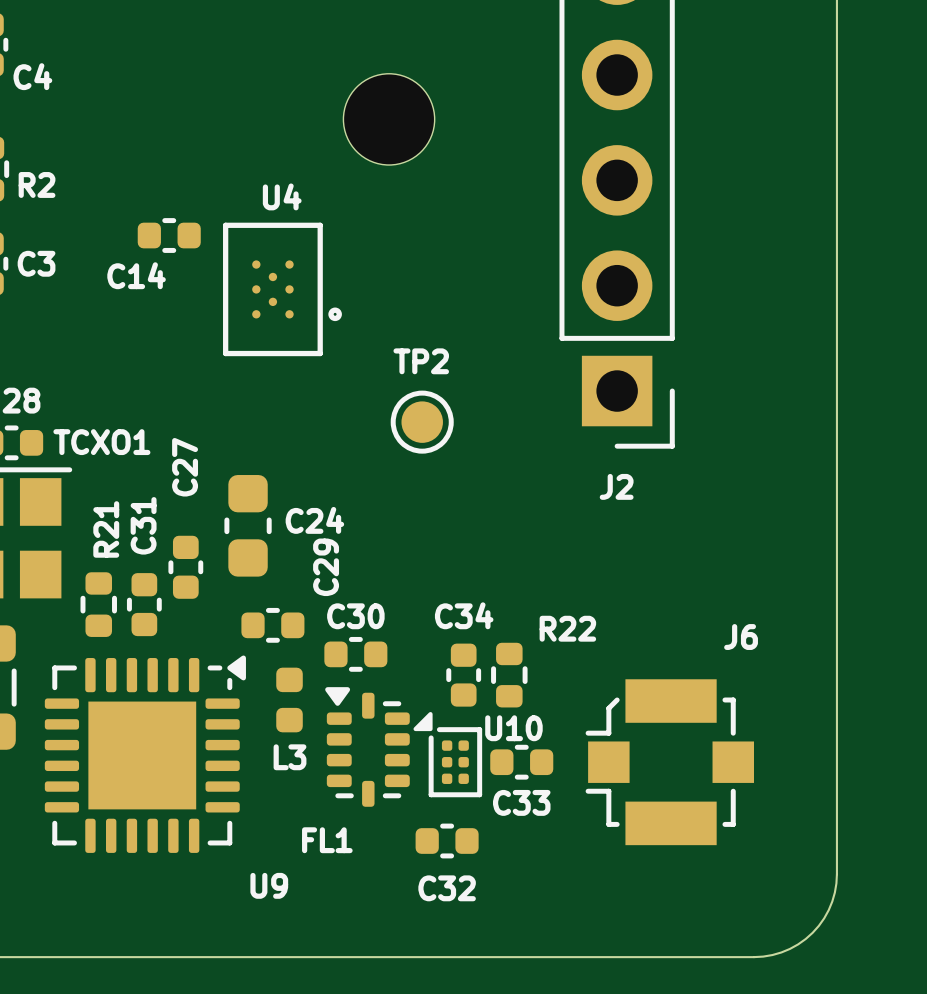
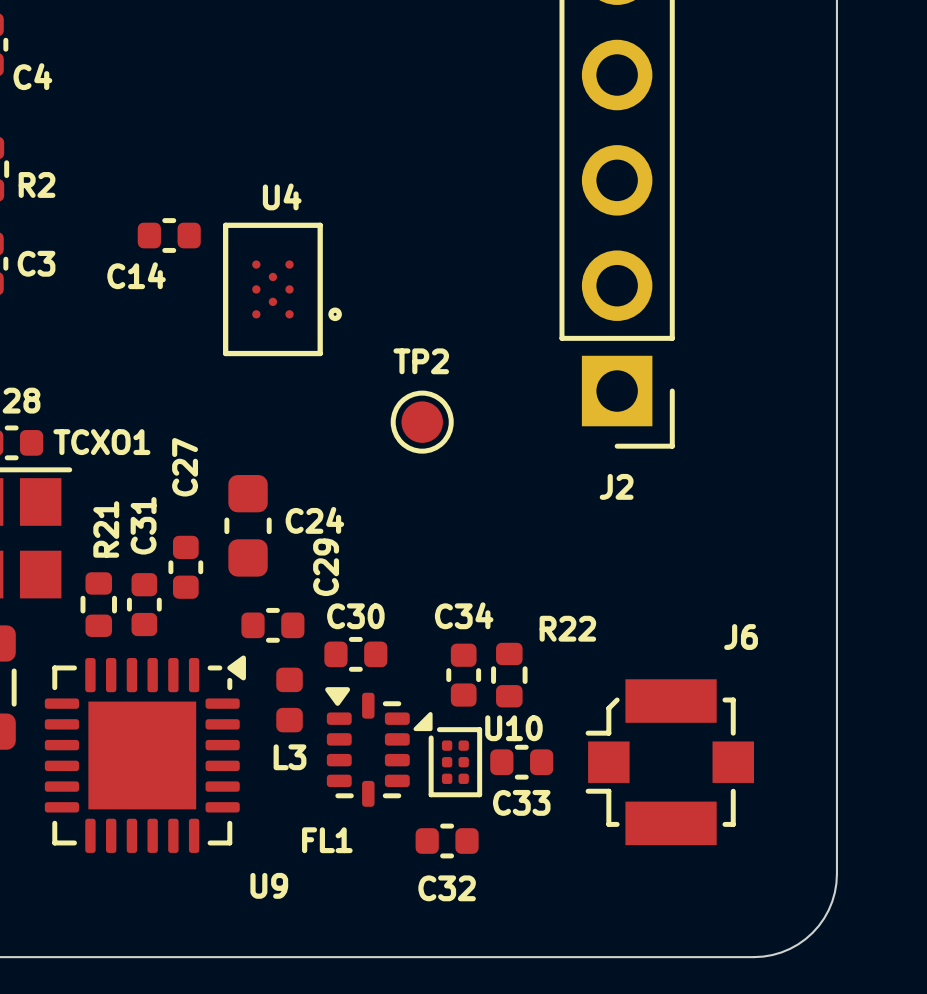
part: (389, 119) -> none

